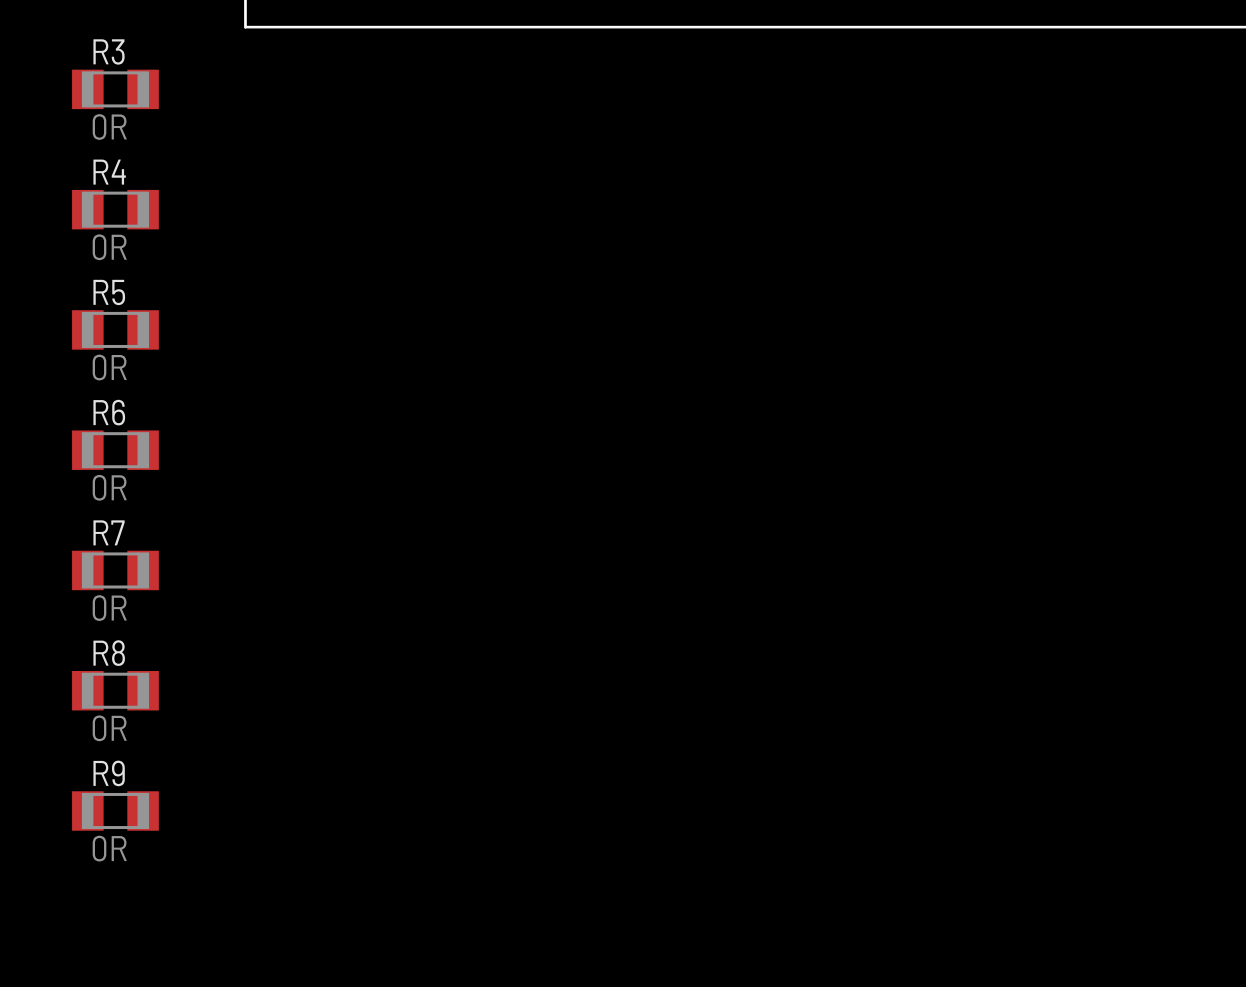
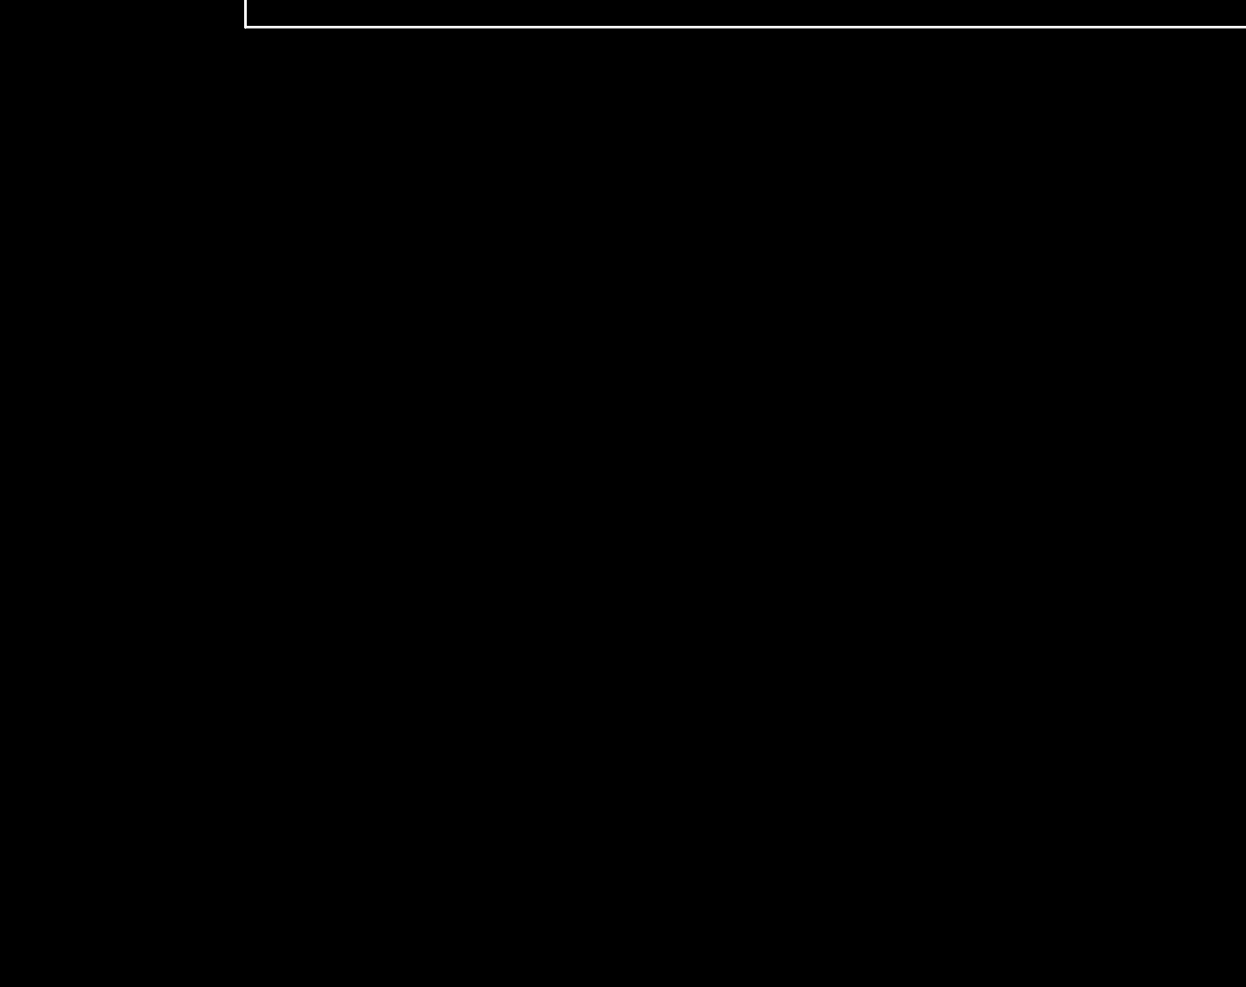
R3: 0R (115, 89) -> none
R4: 0R (115, 209) -> none
R5: 0R (115, 329) -> none
R6: 0R (115, 450) -> none
R7: 0R (115, 570) -> none
R8: 0R (115, 690) -> none
R9: 0R (115, 811) -> none

